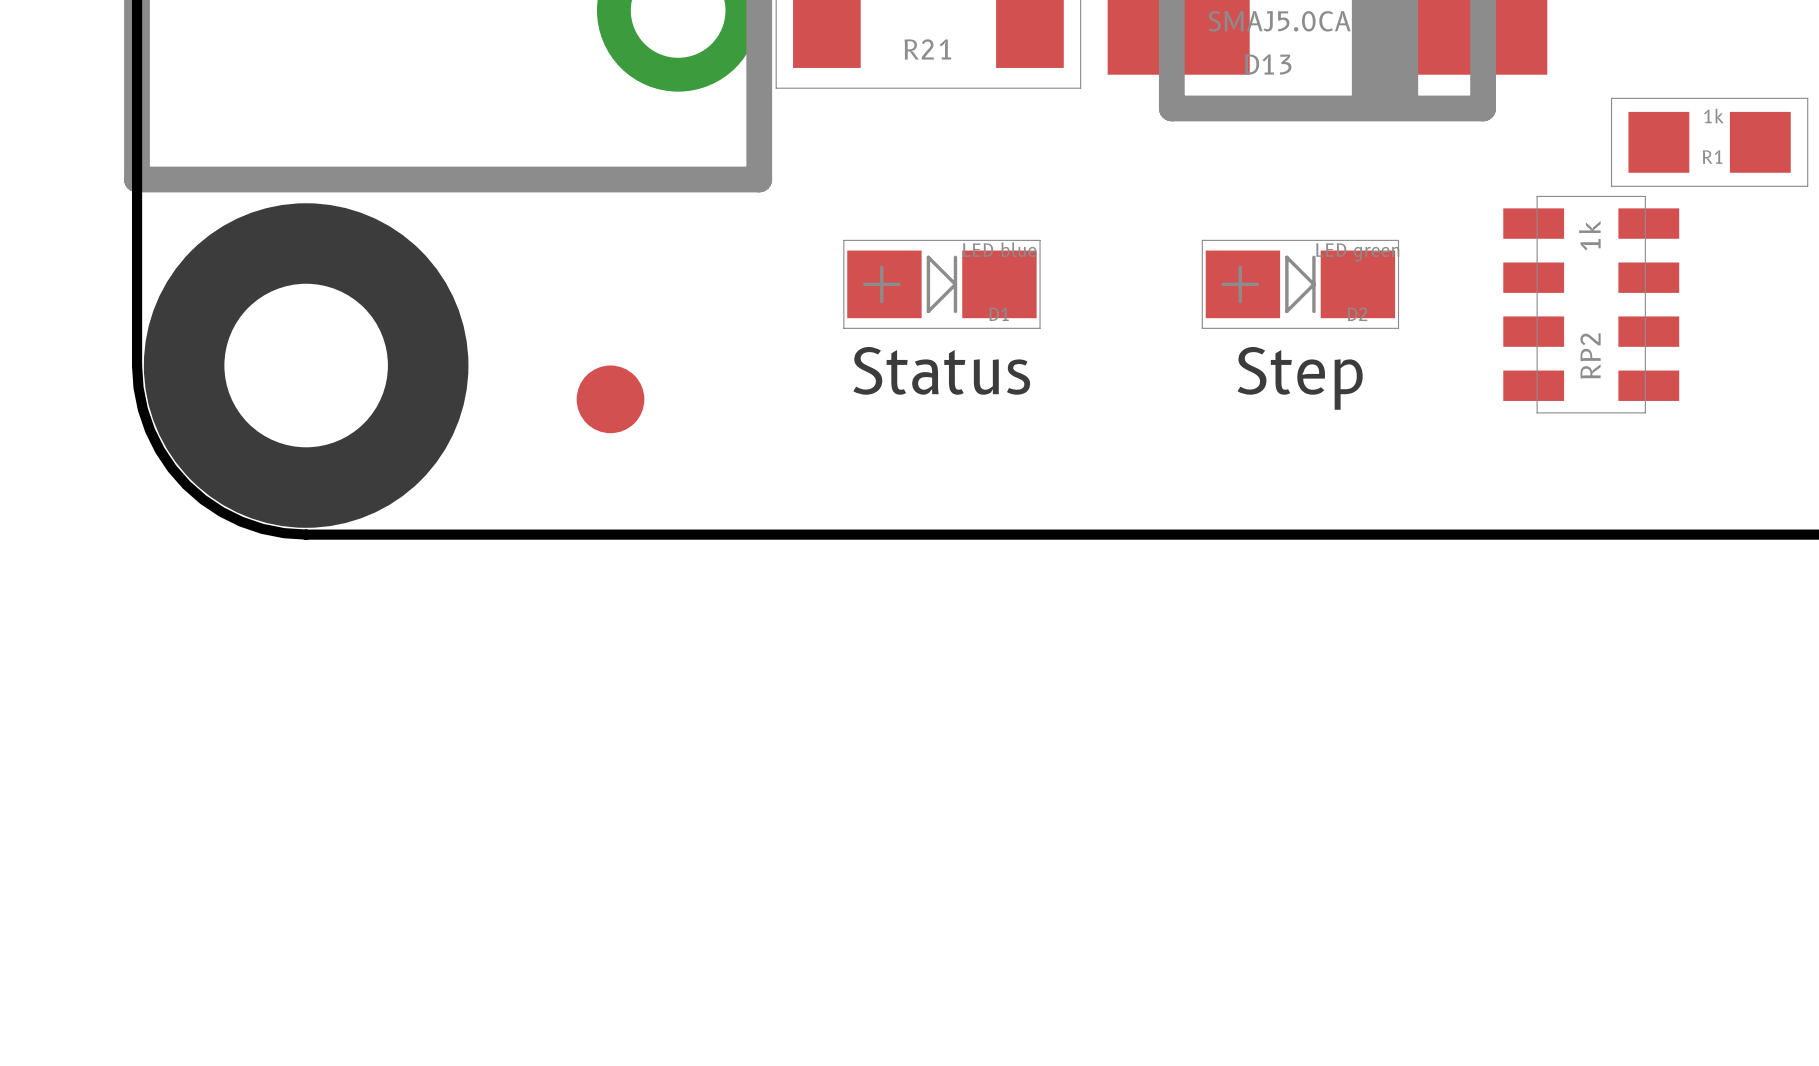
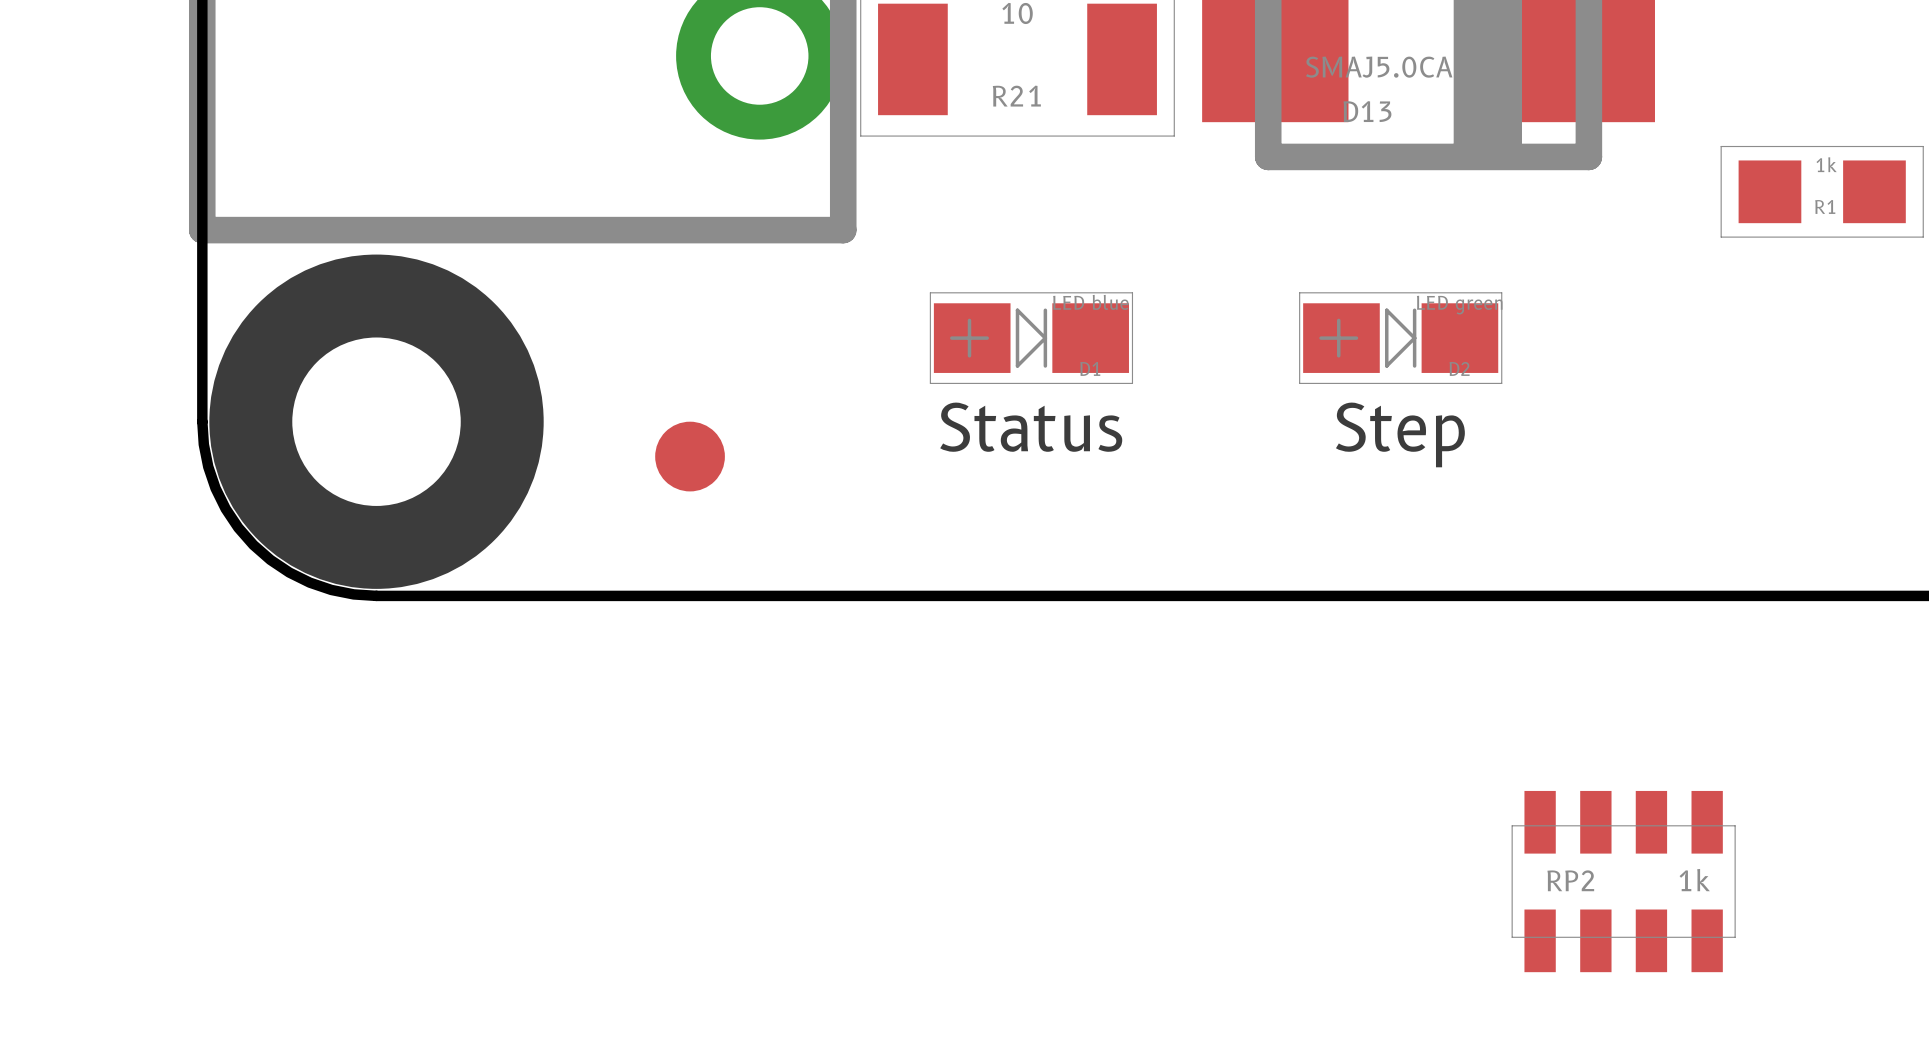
RP2 rotation: 0° (1591, 304) -> 90° clockwise (1623, 881)
RP2 position: (1591, 304) -> (1623, 881)

